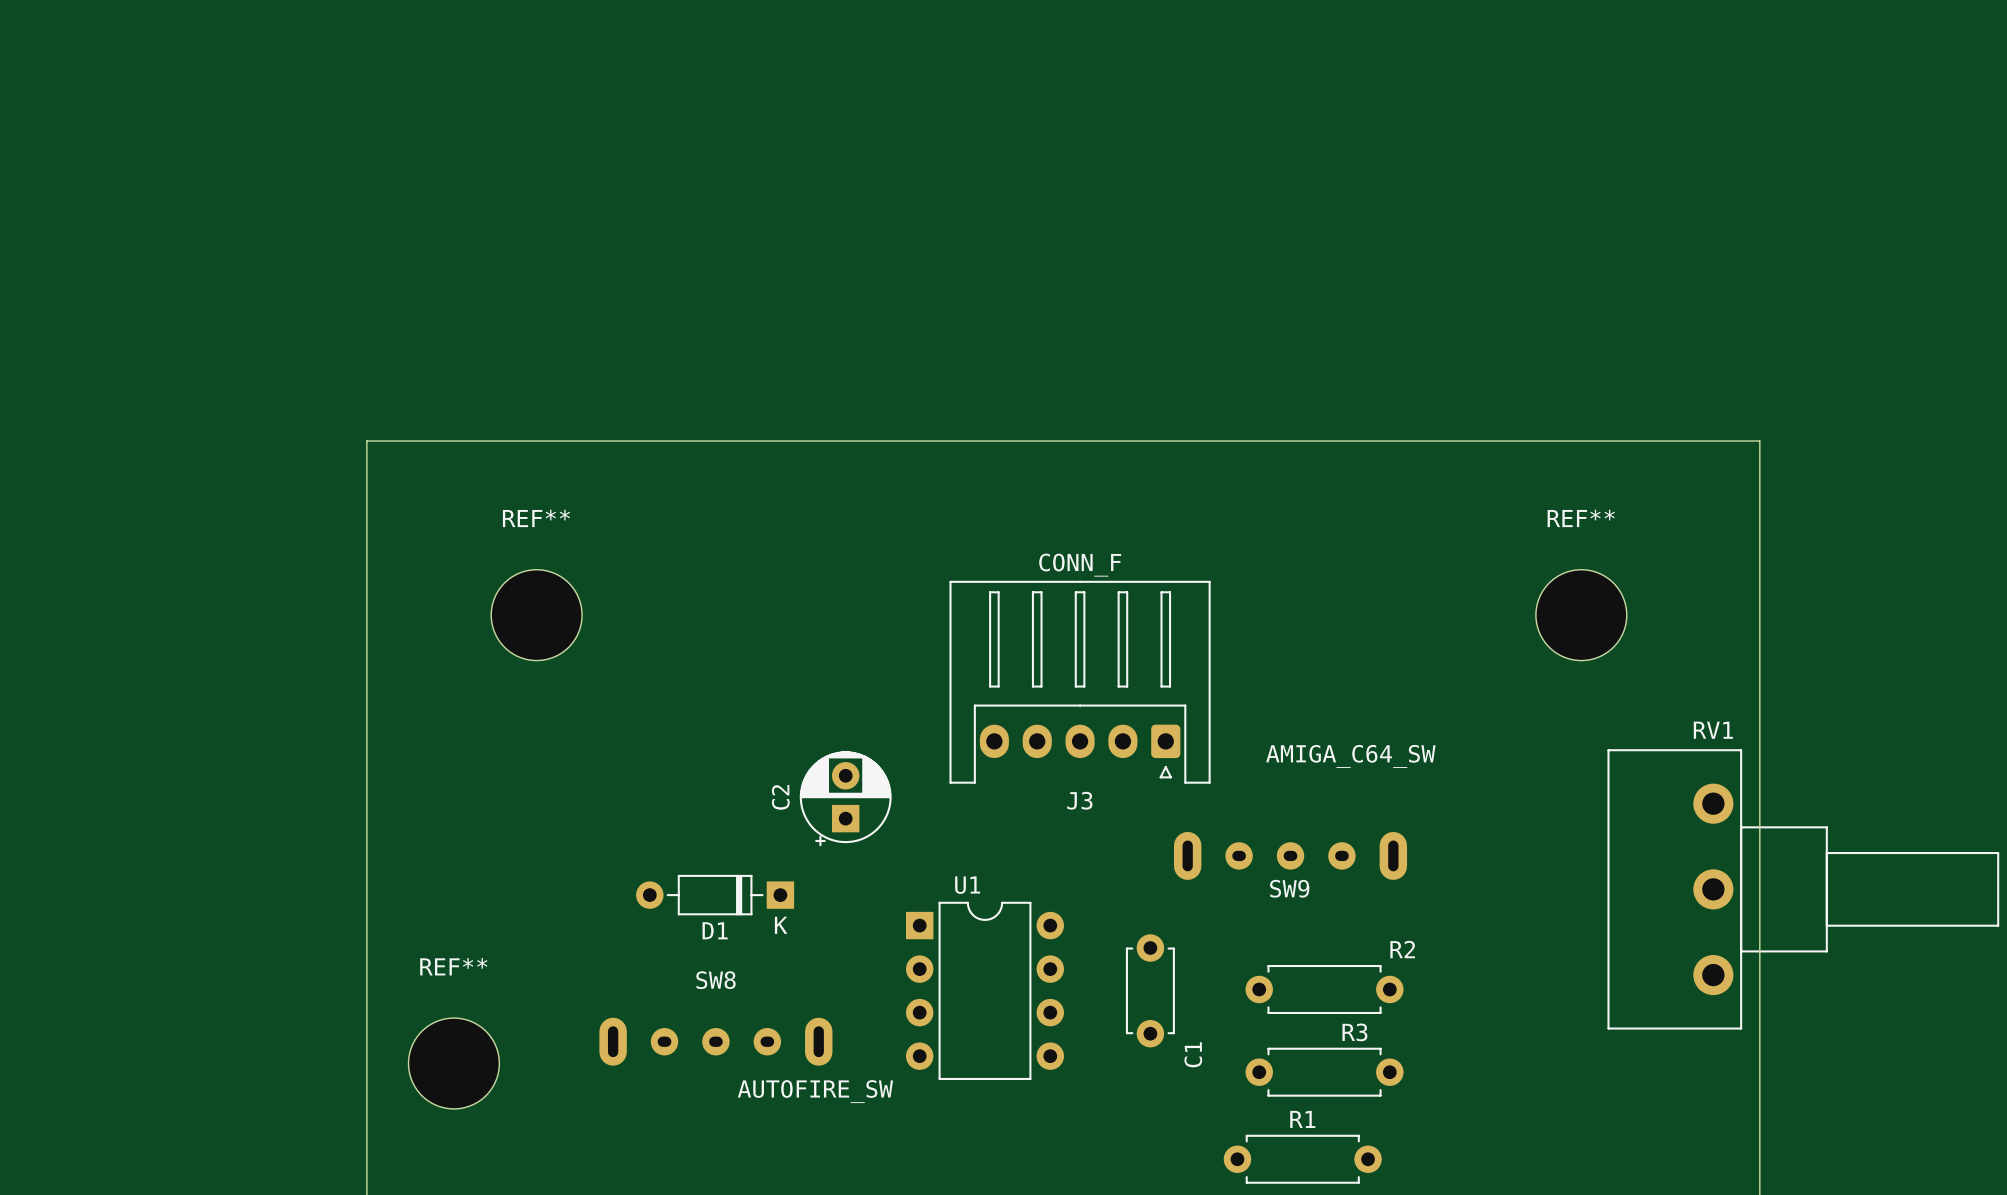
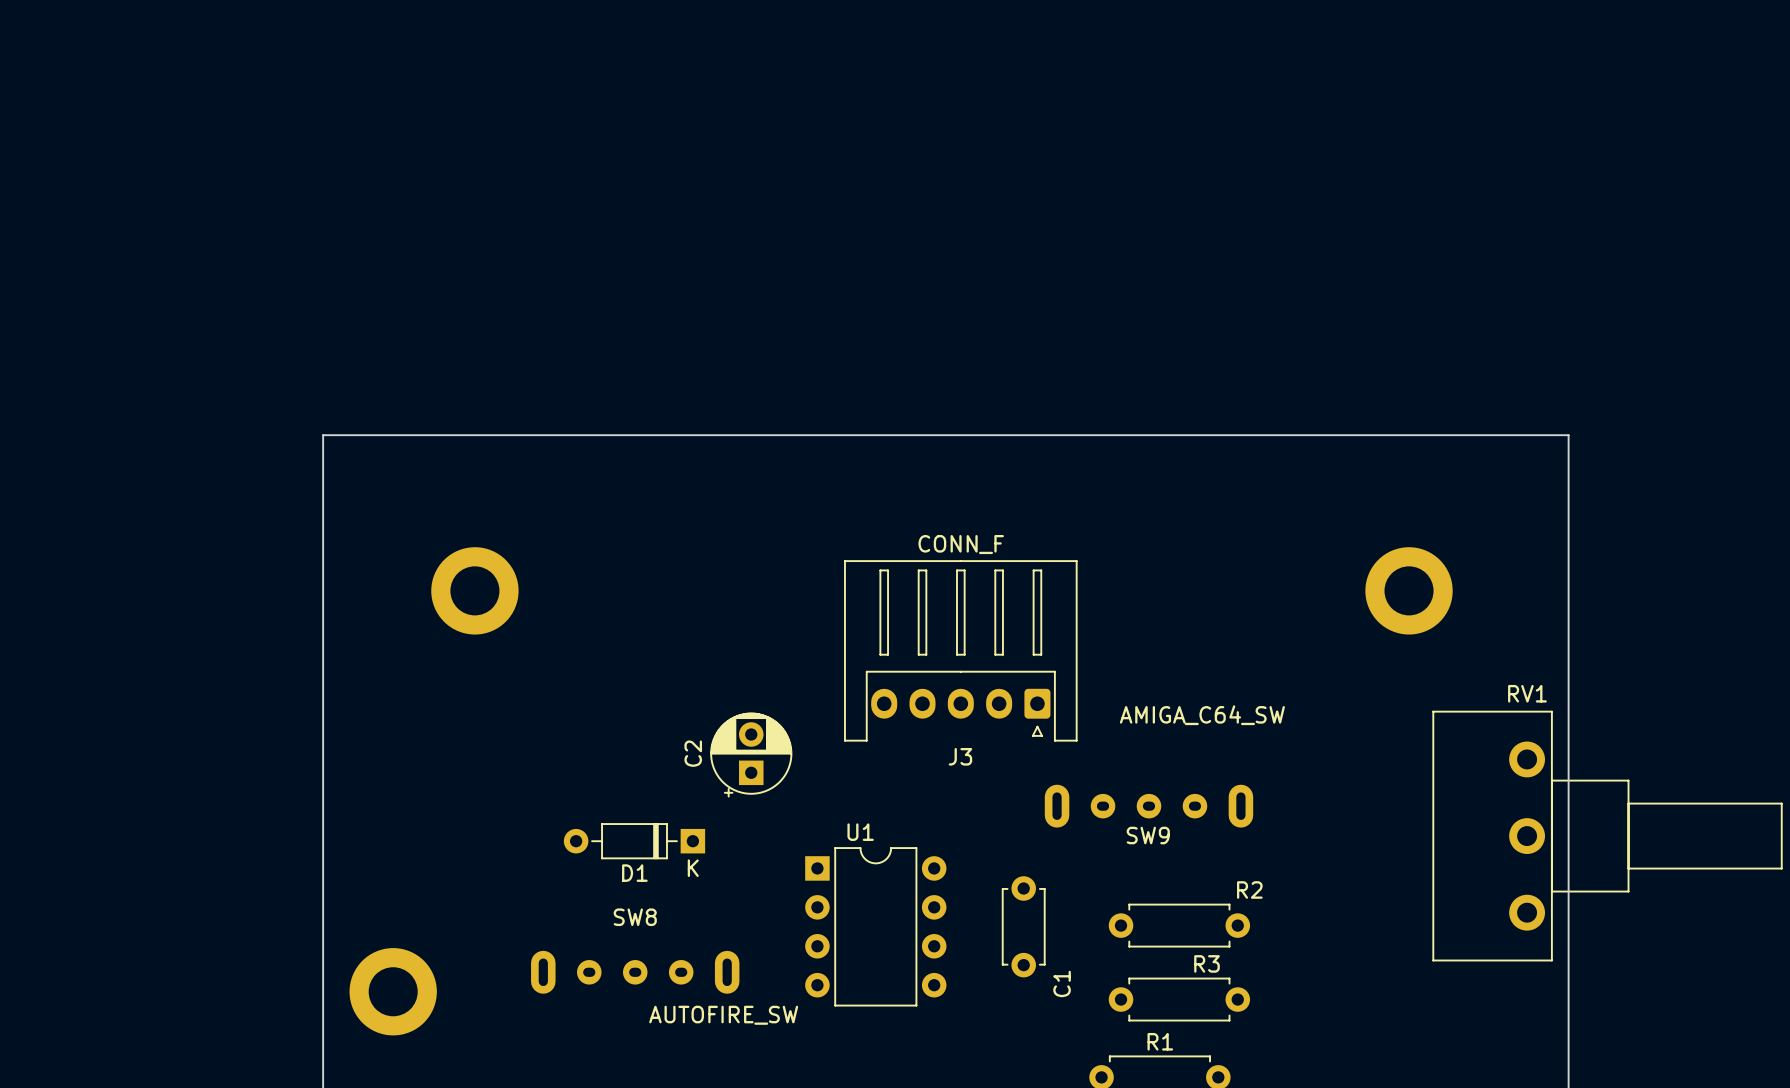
REF**: (536, 615) -> none
part: none -> (474, 590)
REF**: (1581, 615) -> none
part: none -> (1409, 590)
part: none -> (393, 991)
REF**: (453, 1063) -> none

